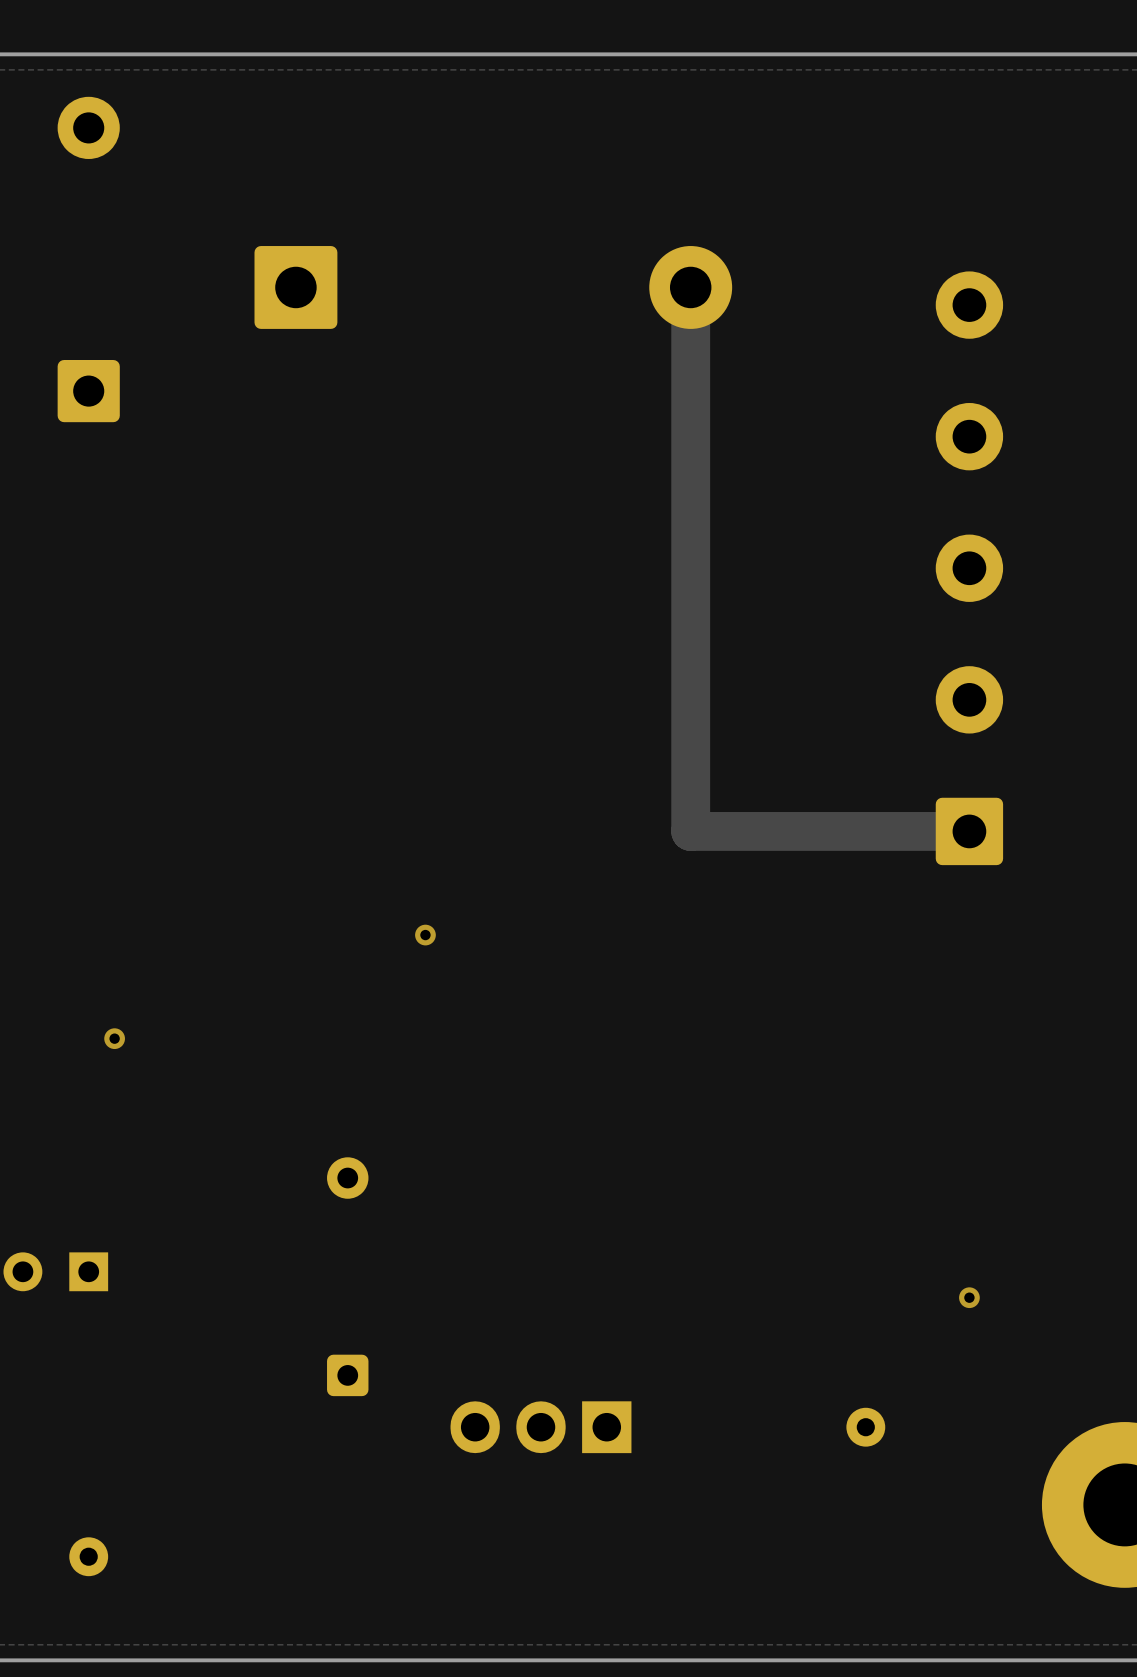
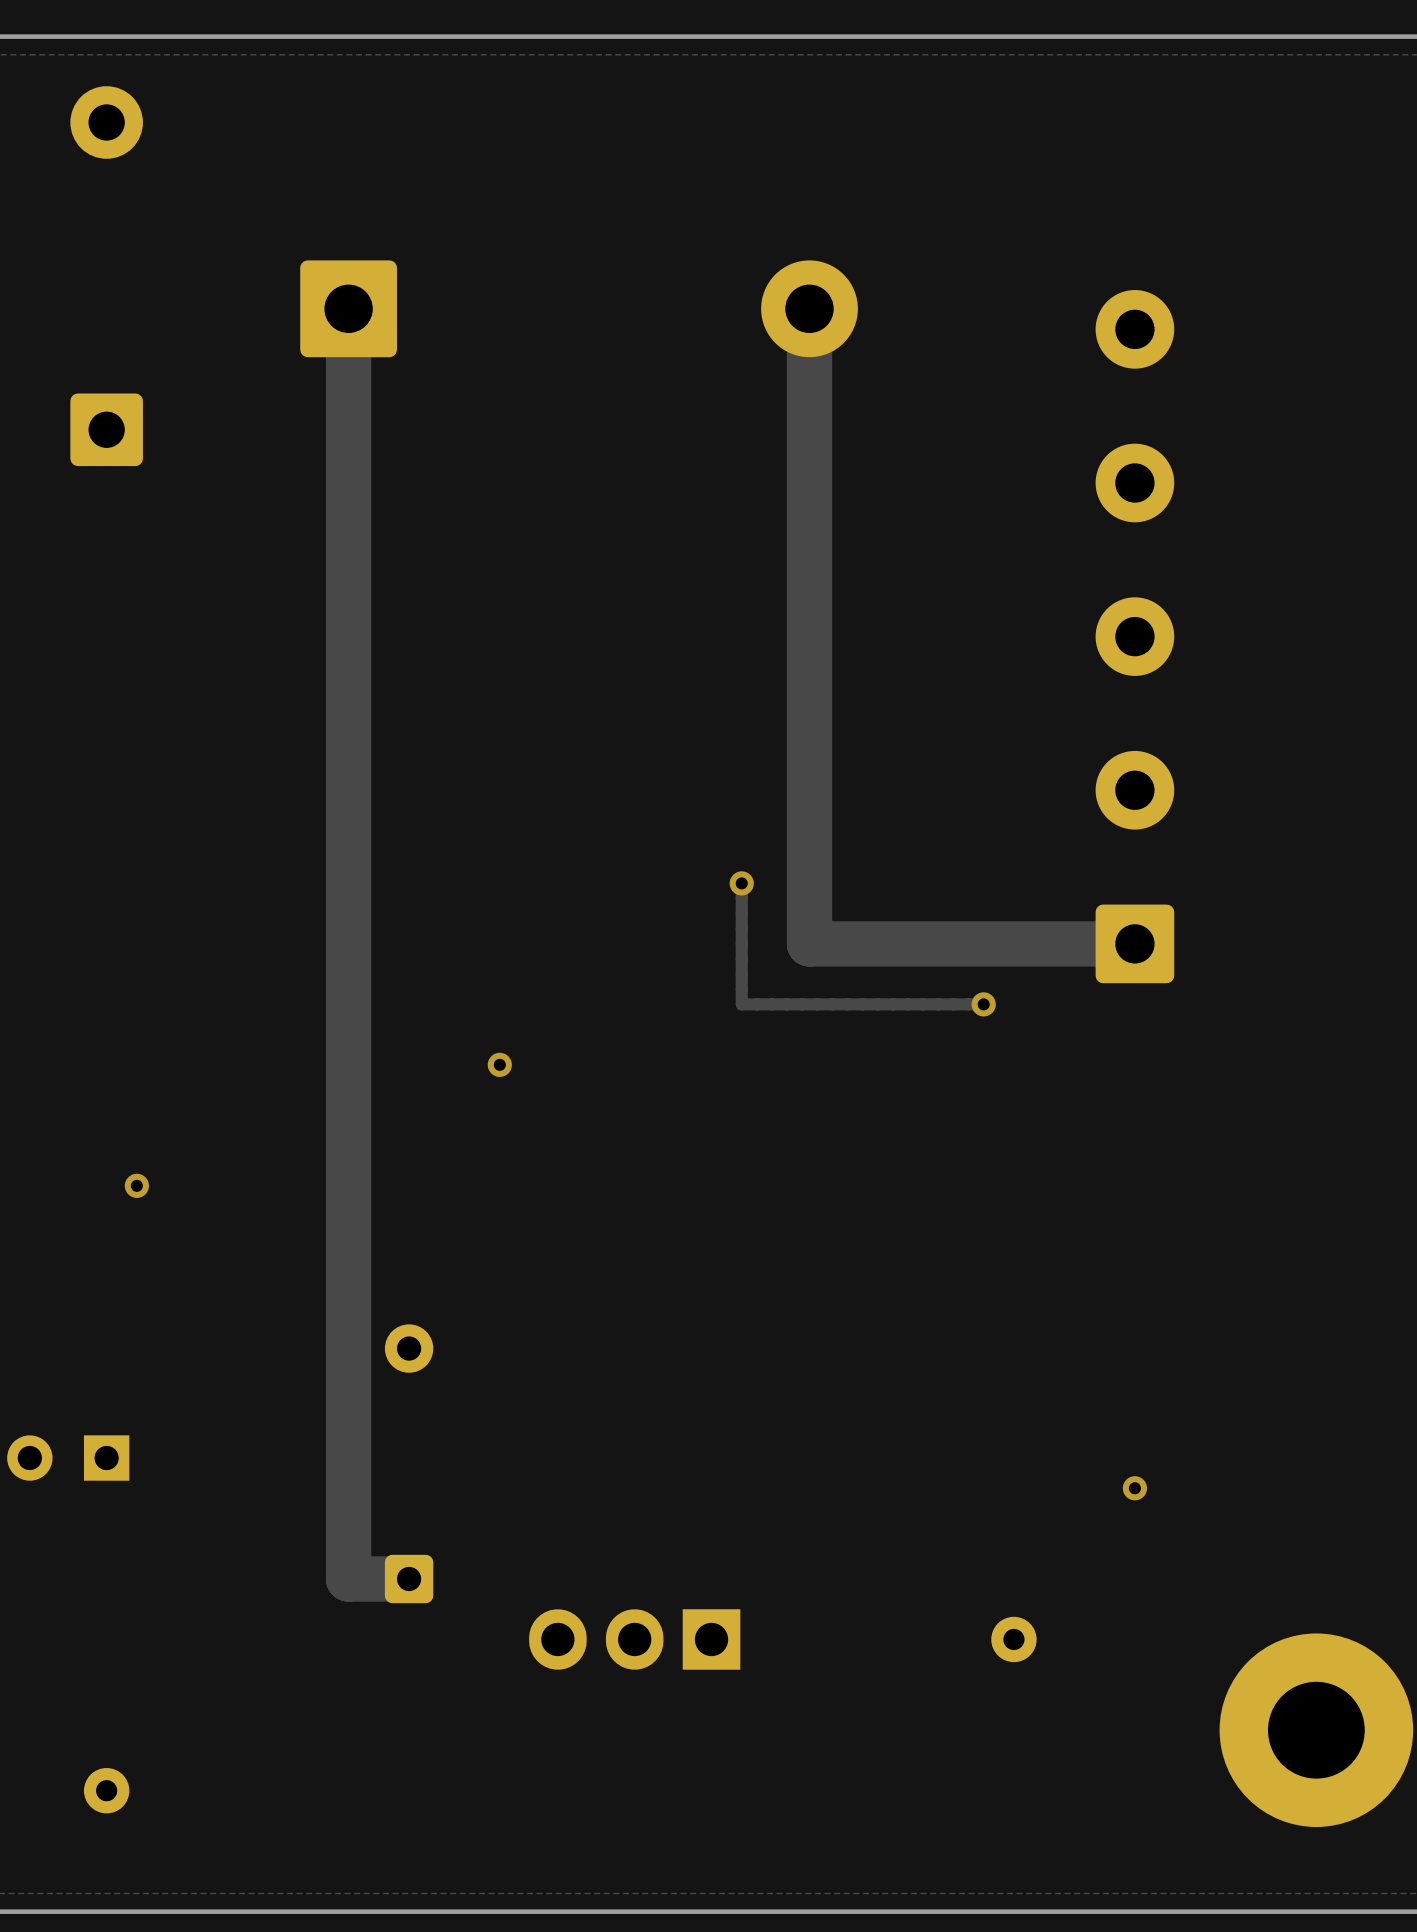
track: none -> (348, 308) (348, 1578) (409, 1578)
track: none -> (741, 883) (741, 1004) (983, 1004)
via: none -> (741, 883)
via: none -> (983, 1004)

